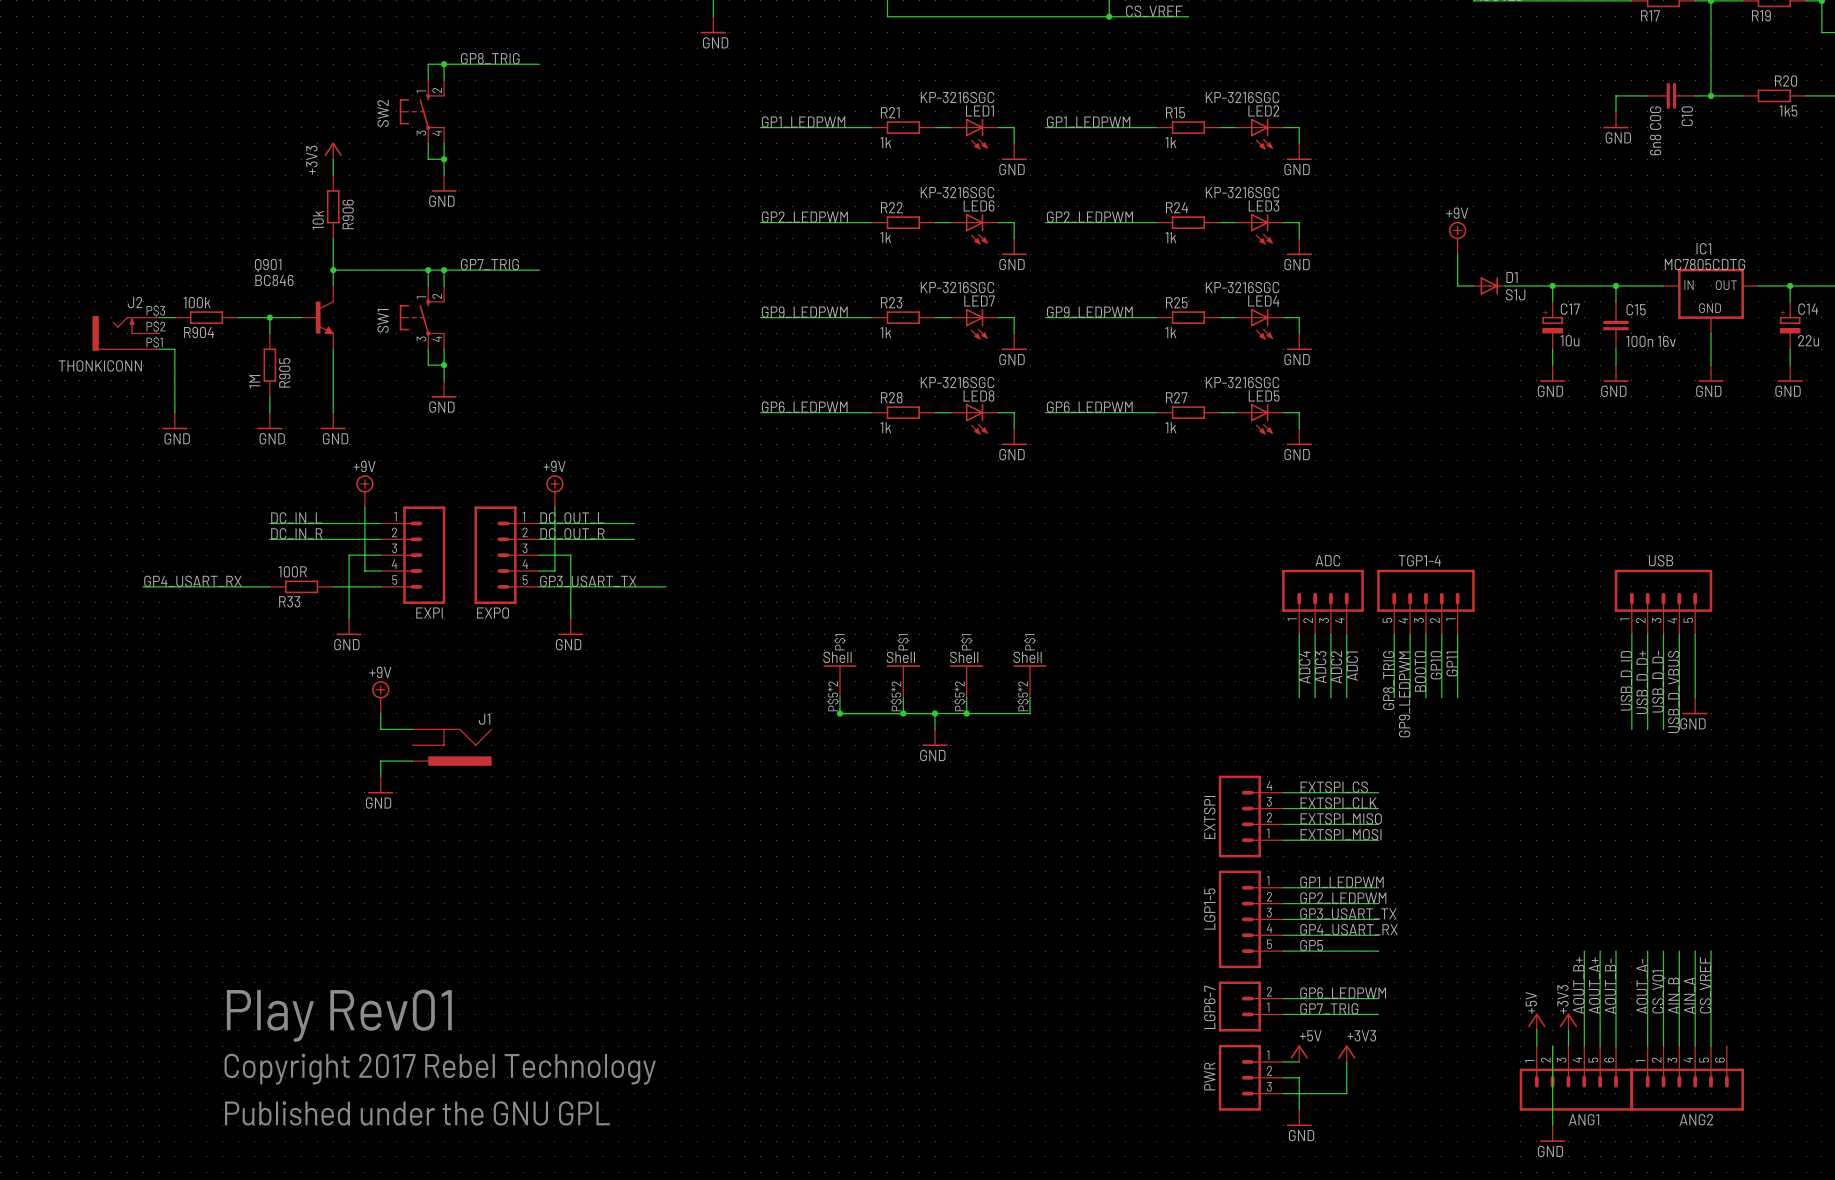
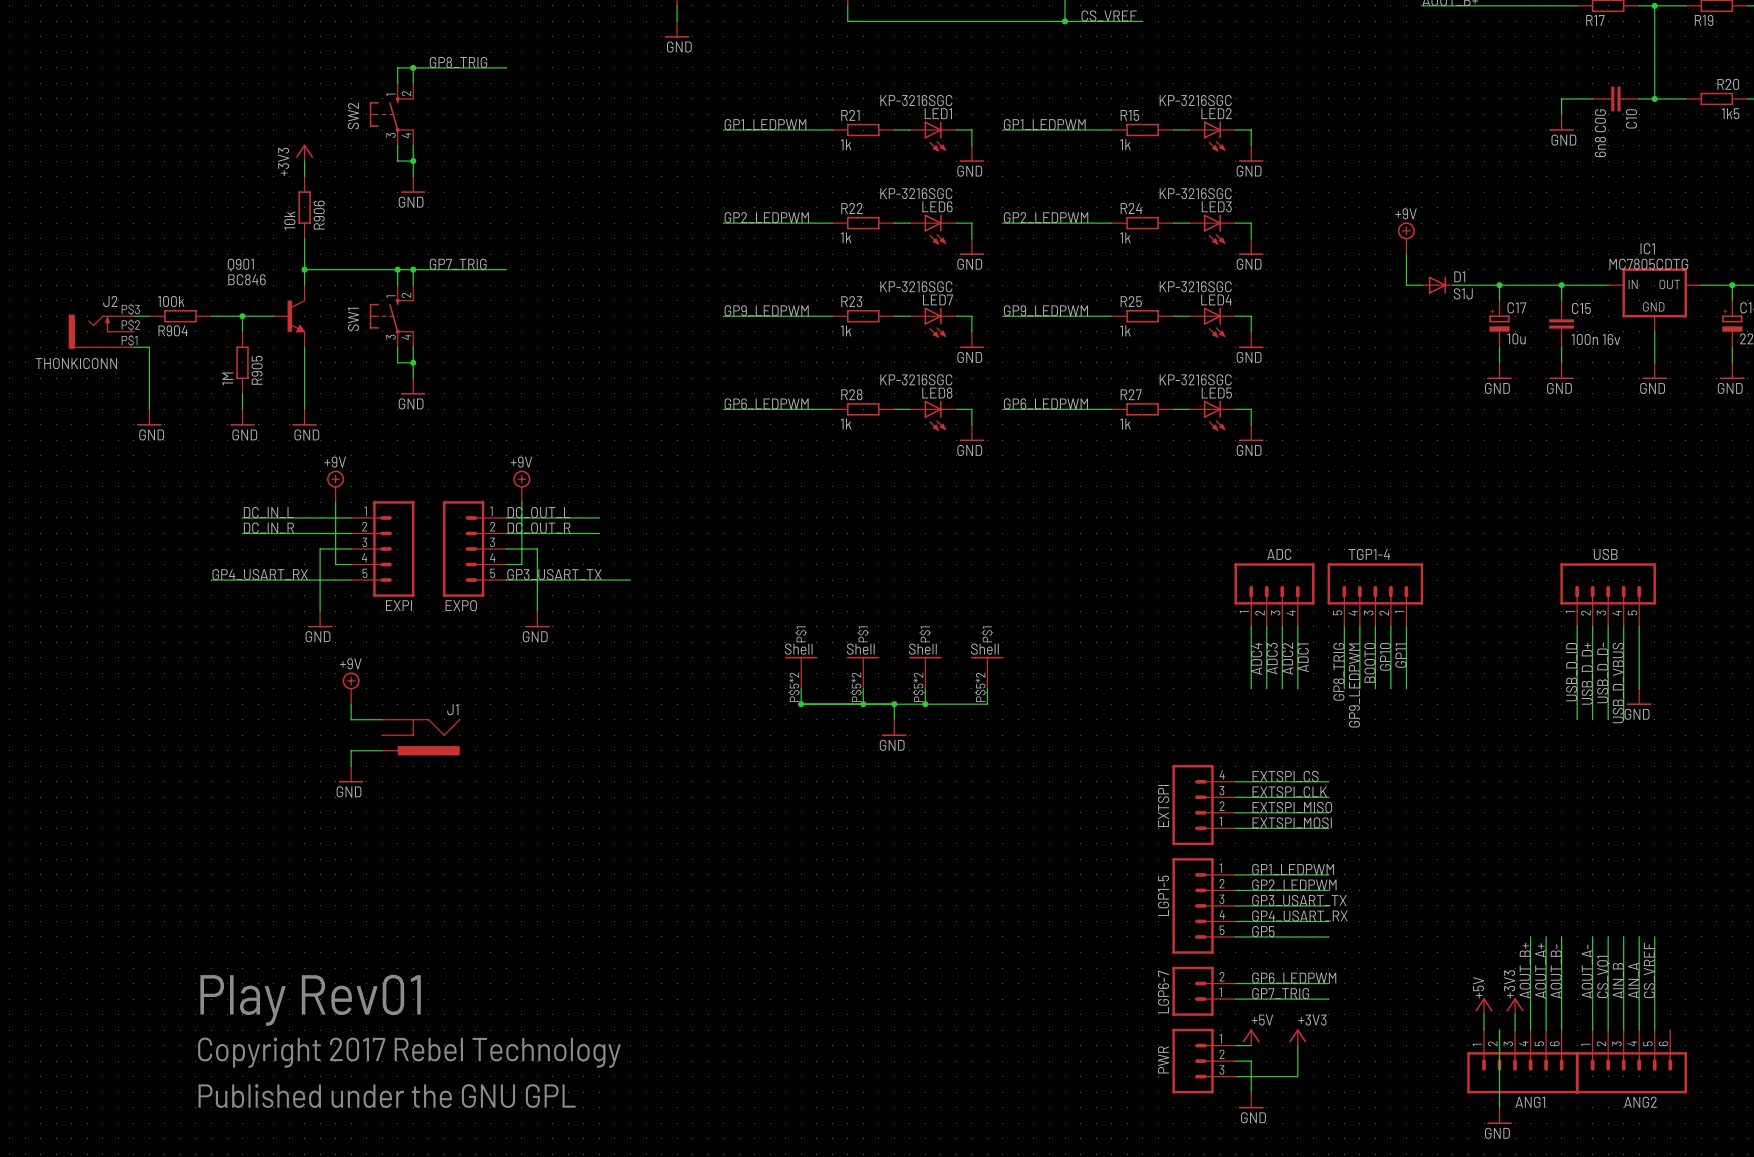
label position: GP4_USART_RX (192, 581) -> GP4_USART_RX (260, 574)
wire: (143, 586) (238, 586) -> none
R33: 100R (301, 586) -> none

